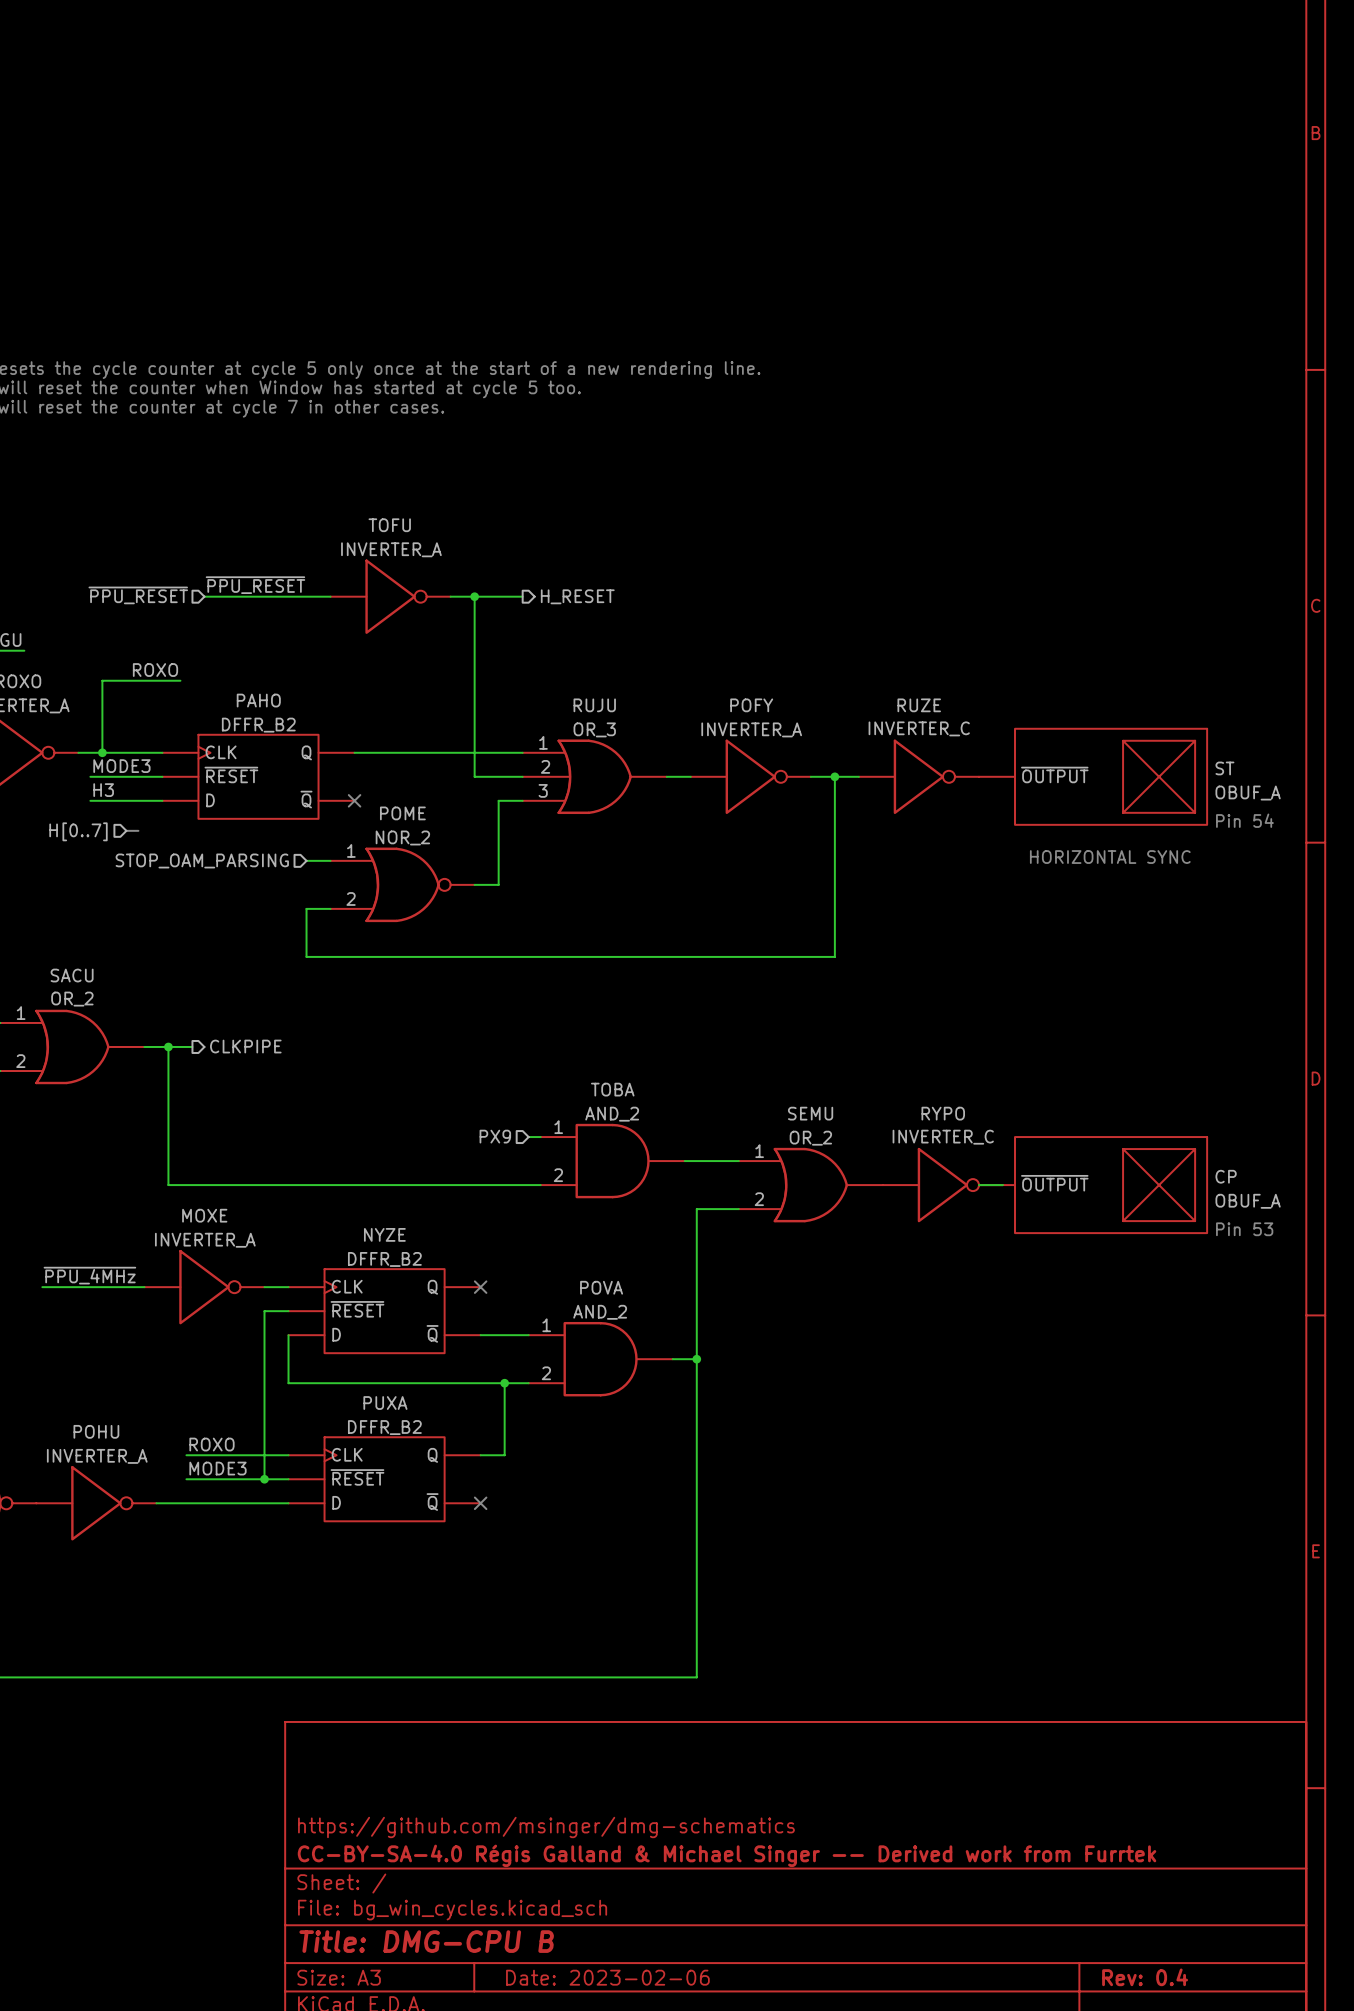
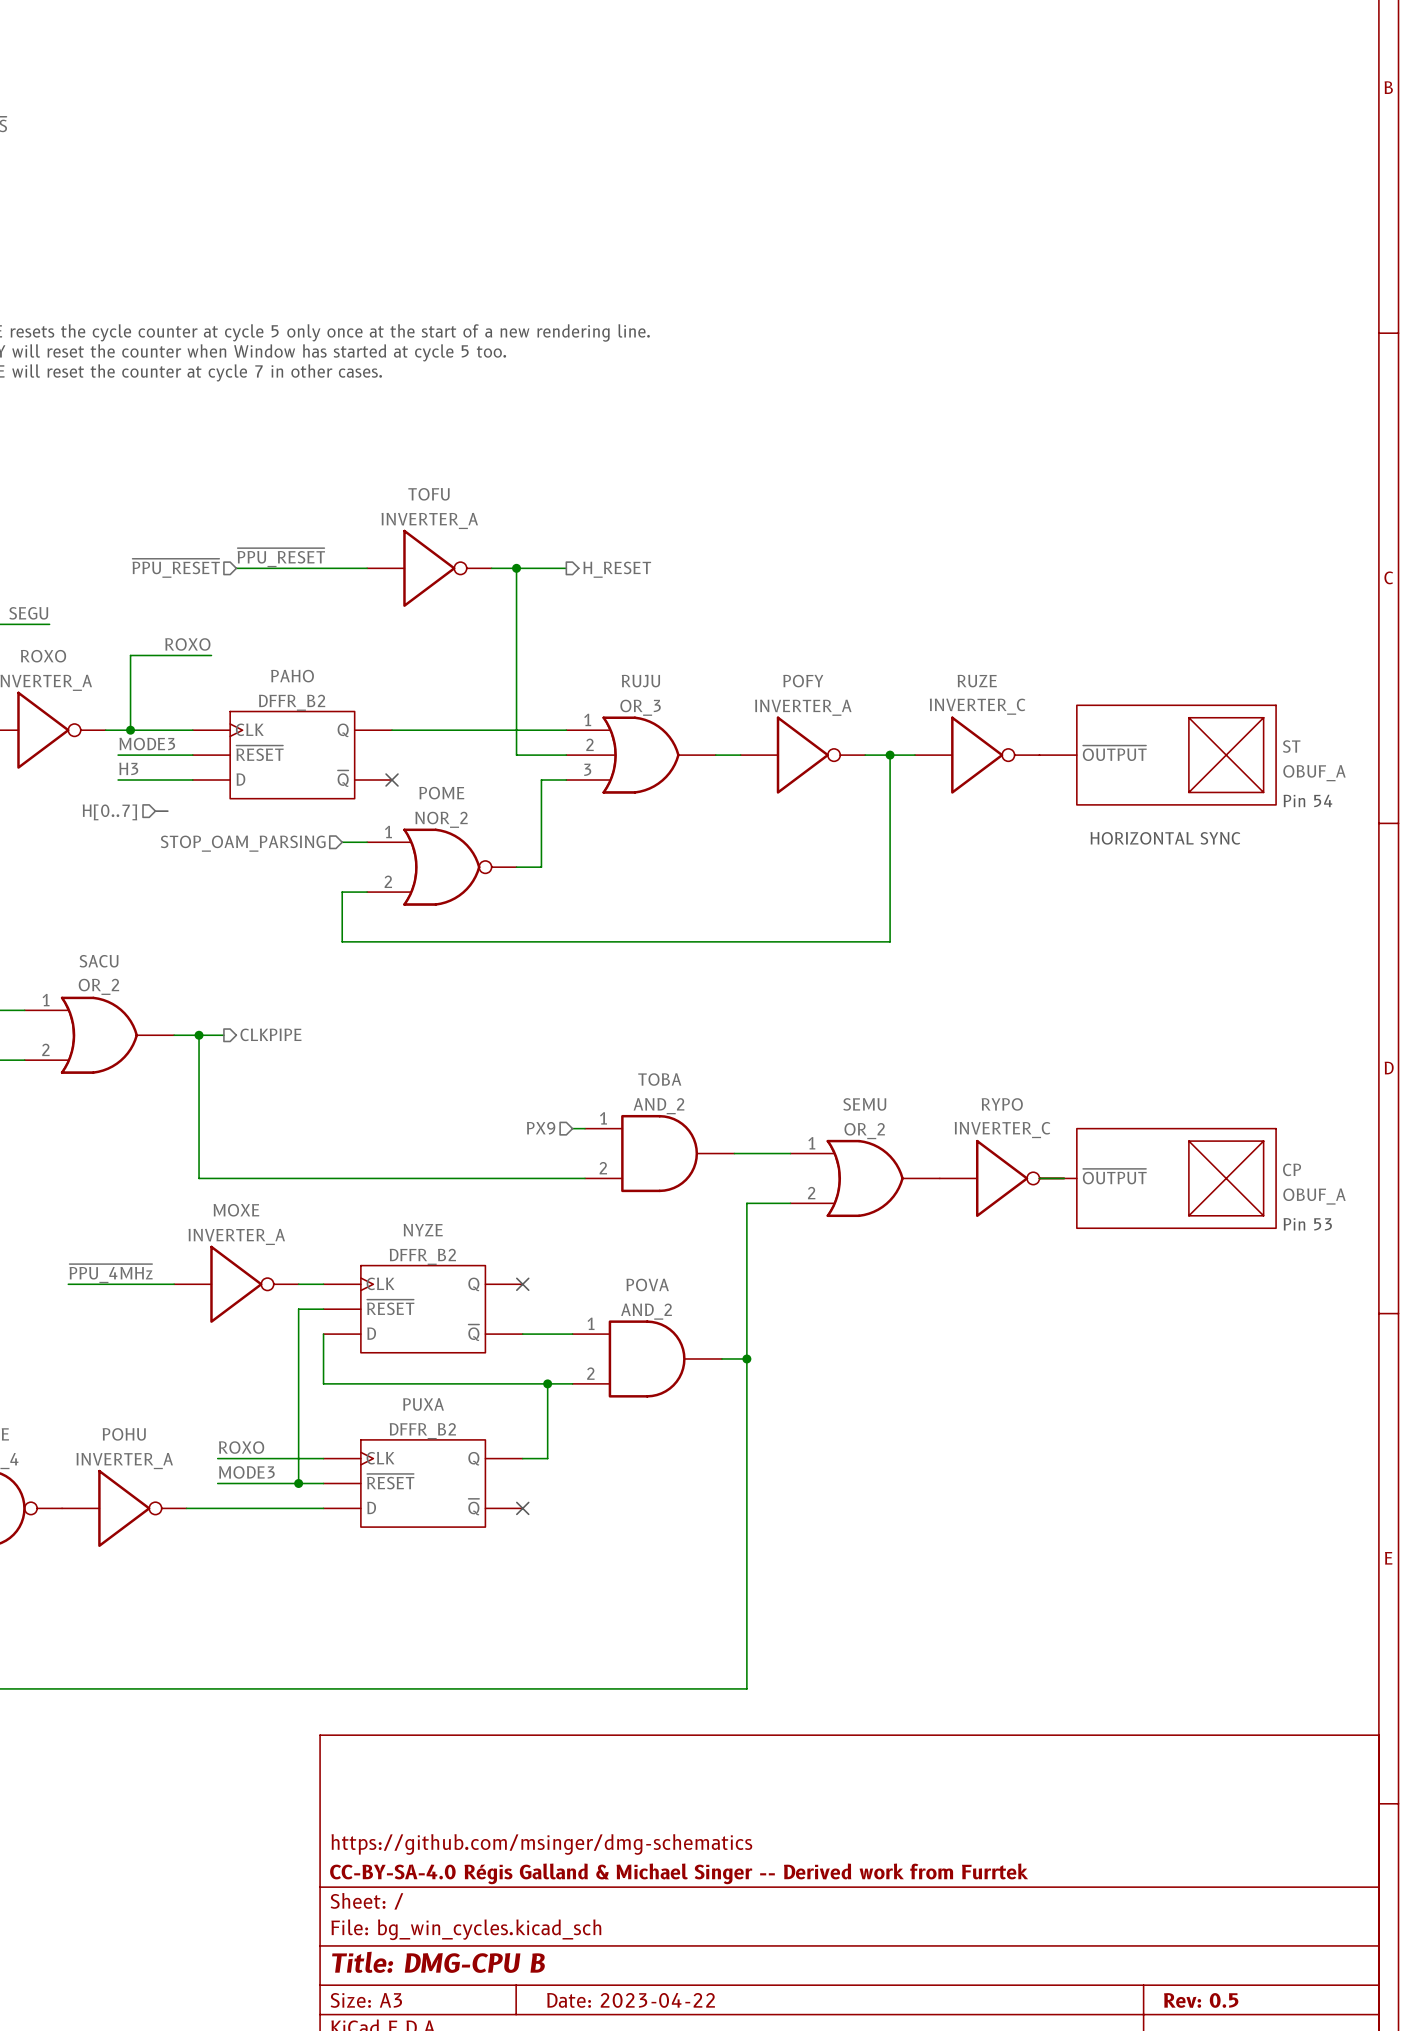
title block: Date: 2023-02-06 (607, 1977) -> Date: 2023-04-22 (631, 2000)
title block: Rev: 0.4 (1145, 1977) -> Rev: 0.5 (1201, 2000)

